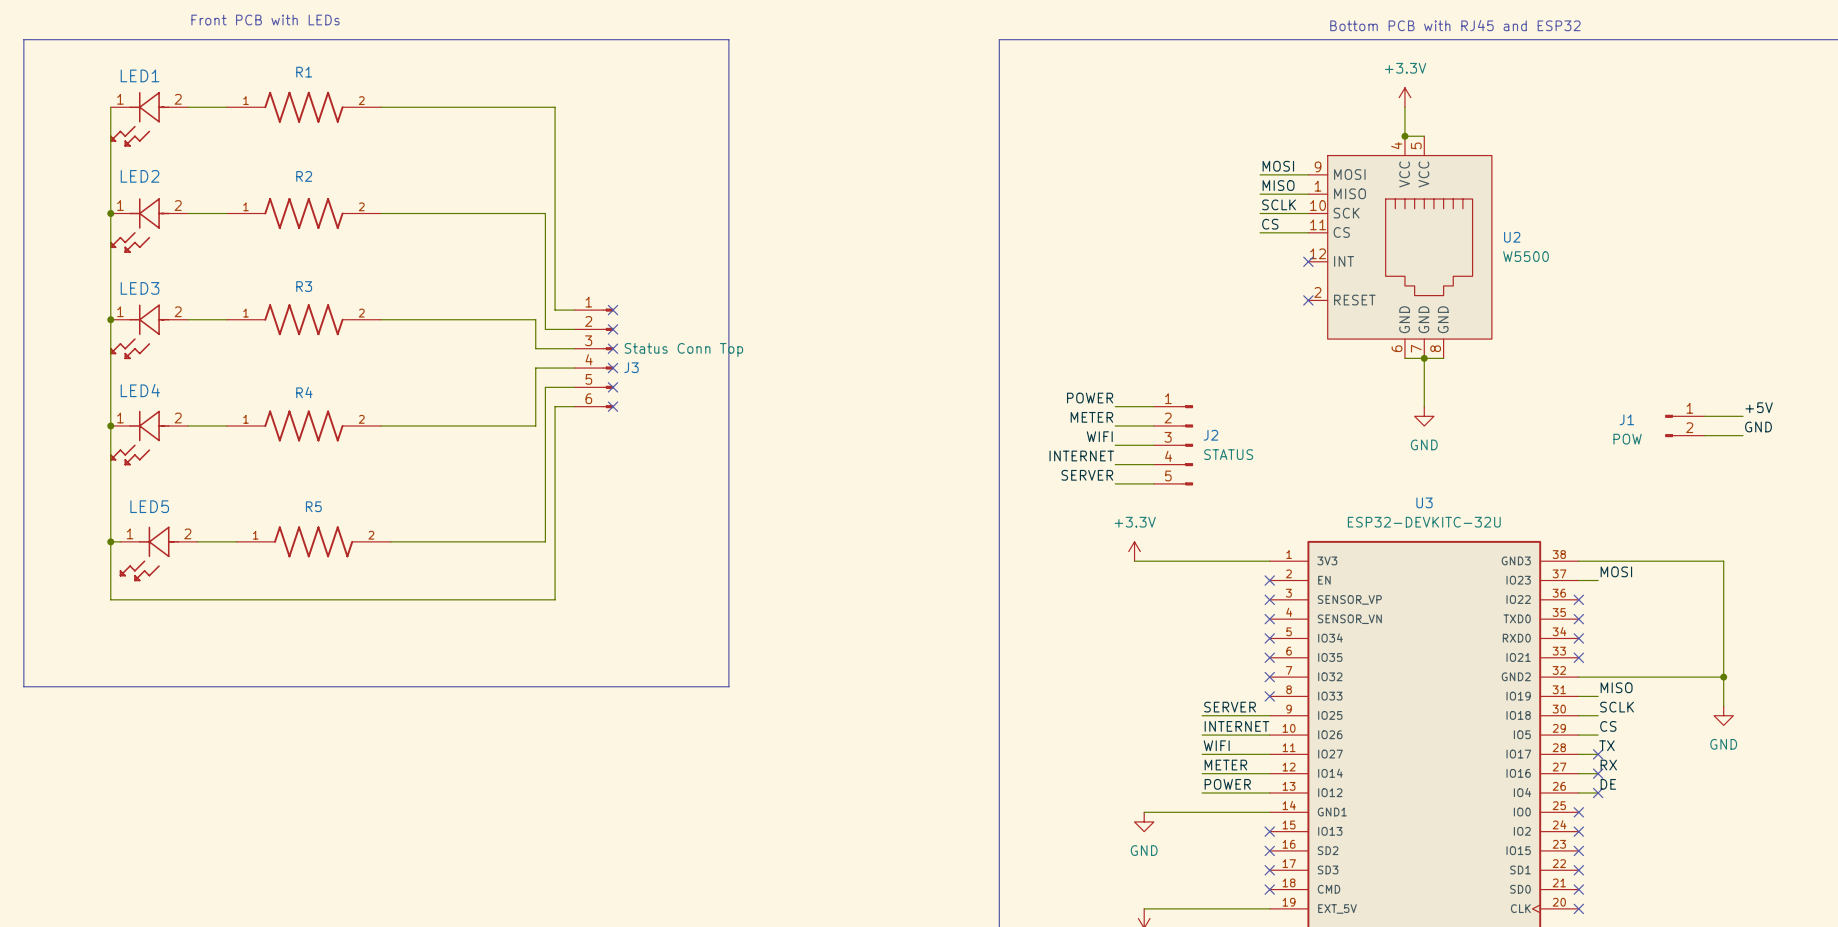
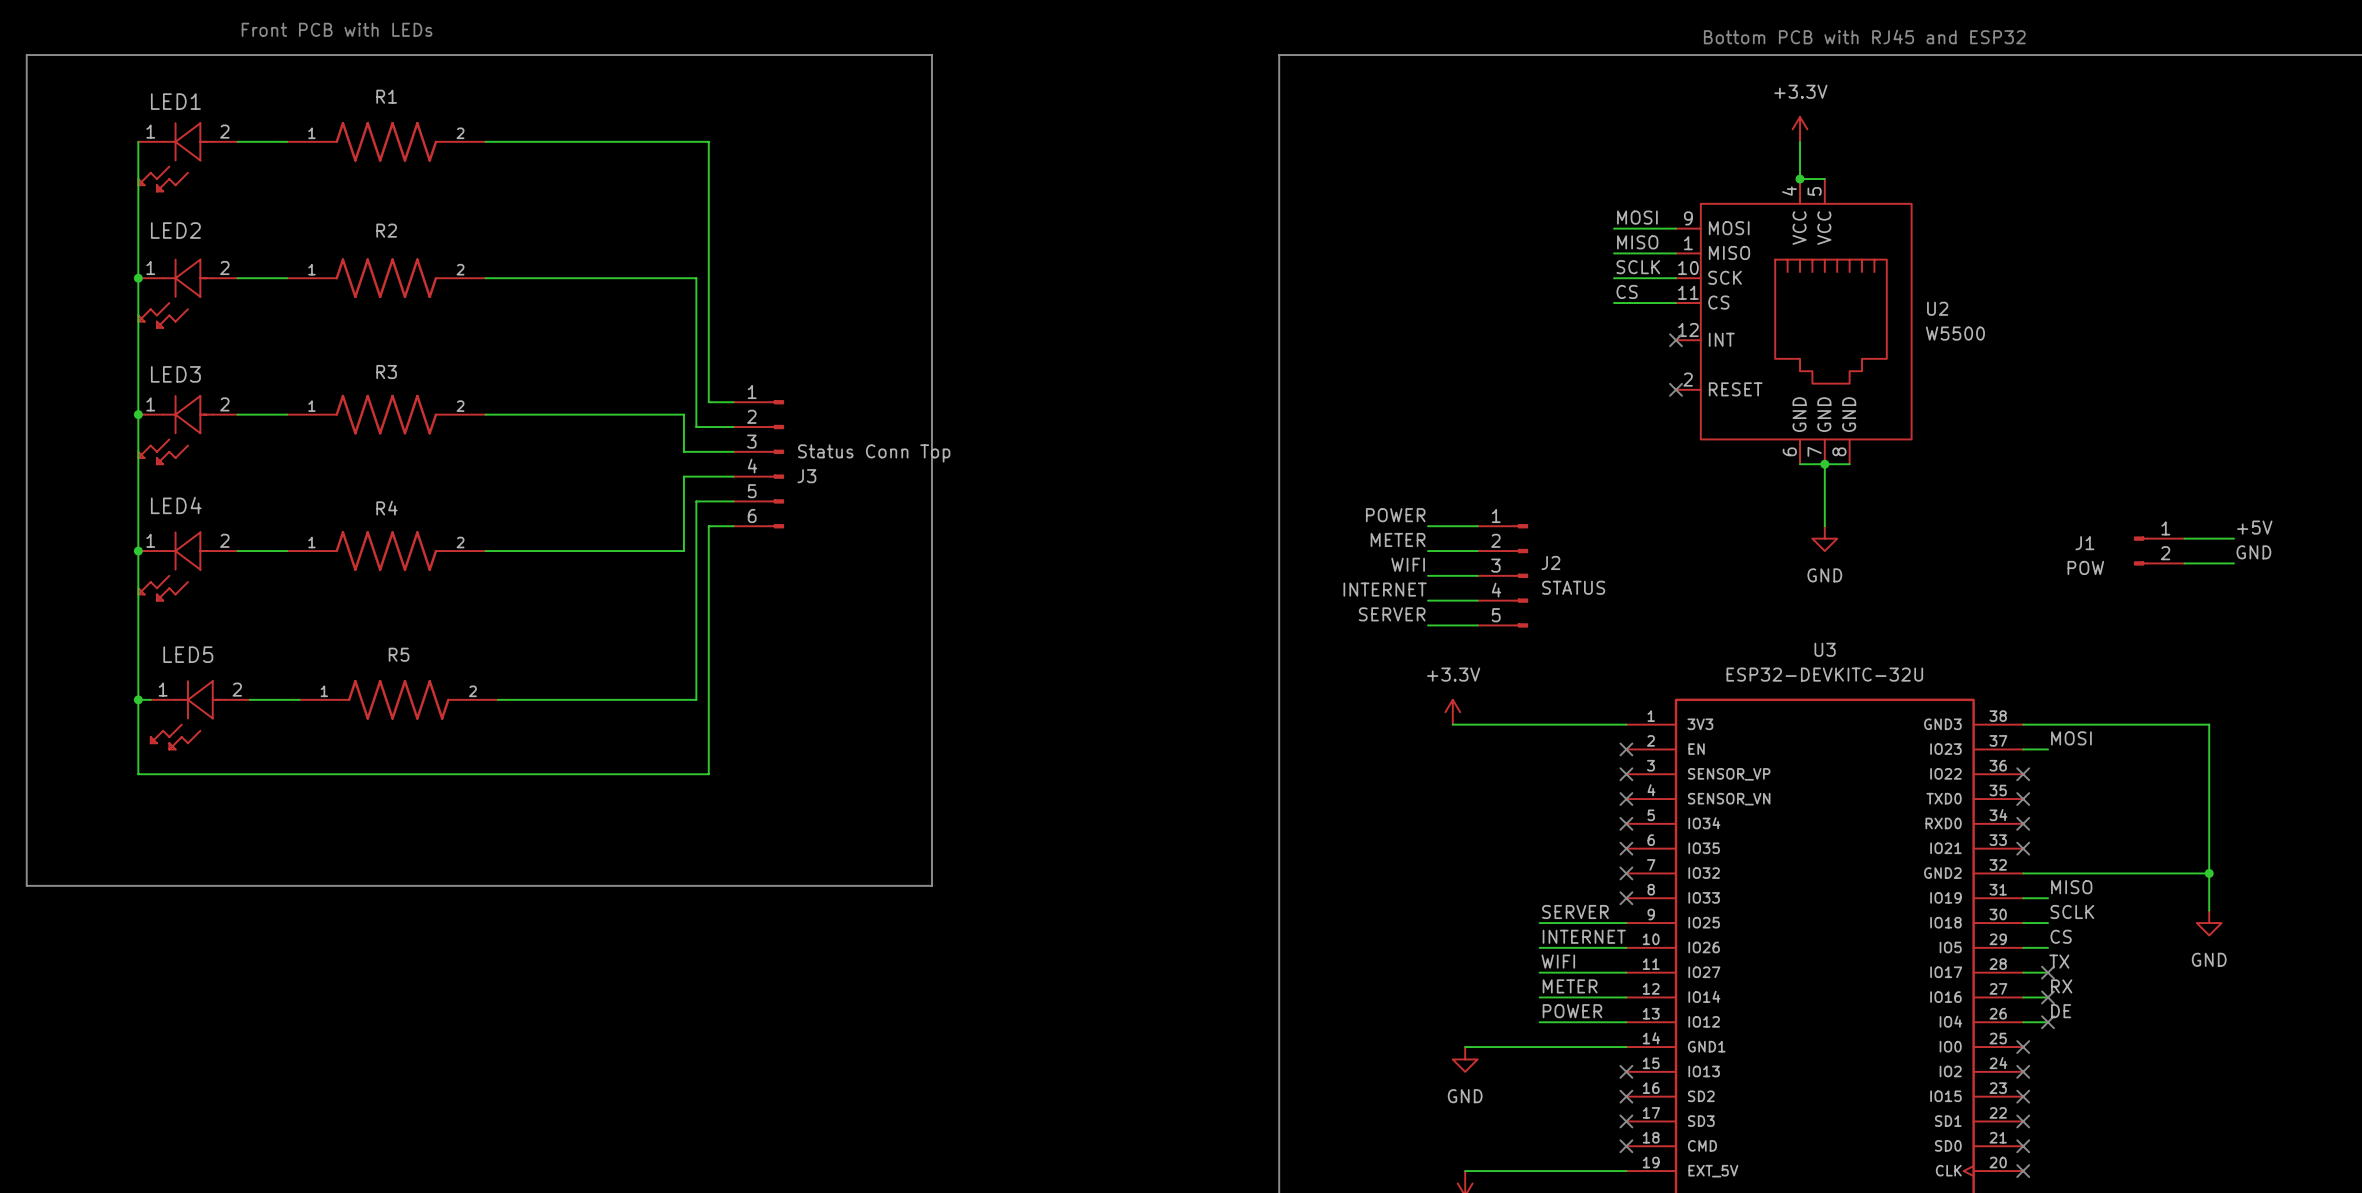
no-connect mark: (613, 310) -> none
no-connect mark: (613, 329) -> none
no-connect mark: (613, 348) -> none
no-connect mark: (613, 368) -> none
no-connect mark: (613, 387) -> none
no-connect mark: (613, 406) -> none

